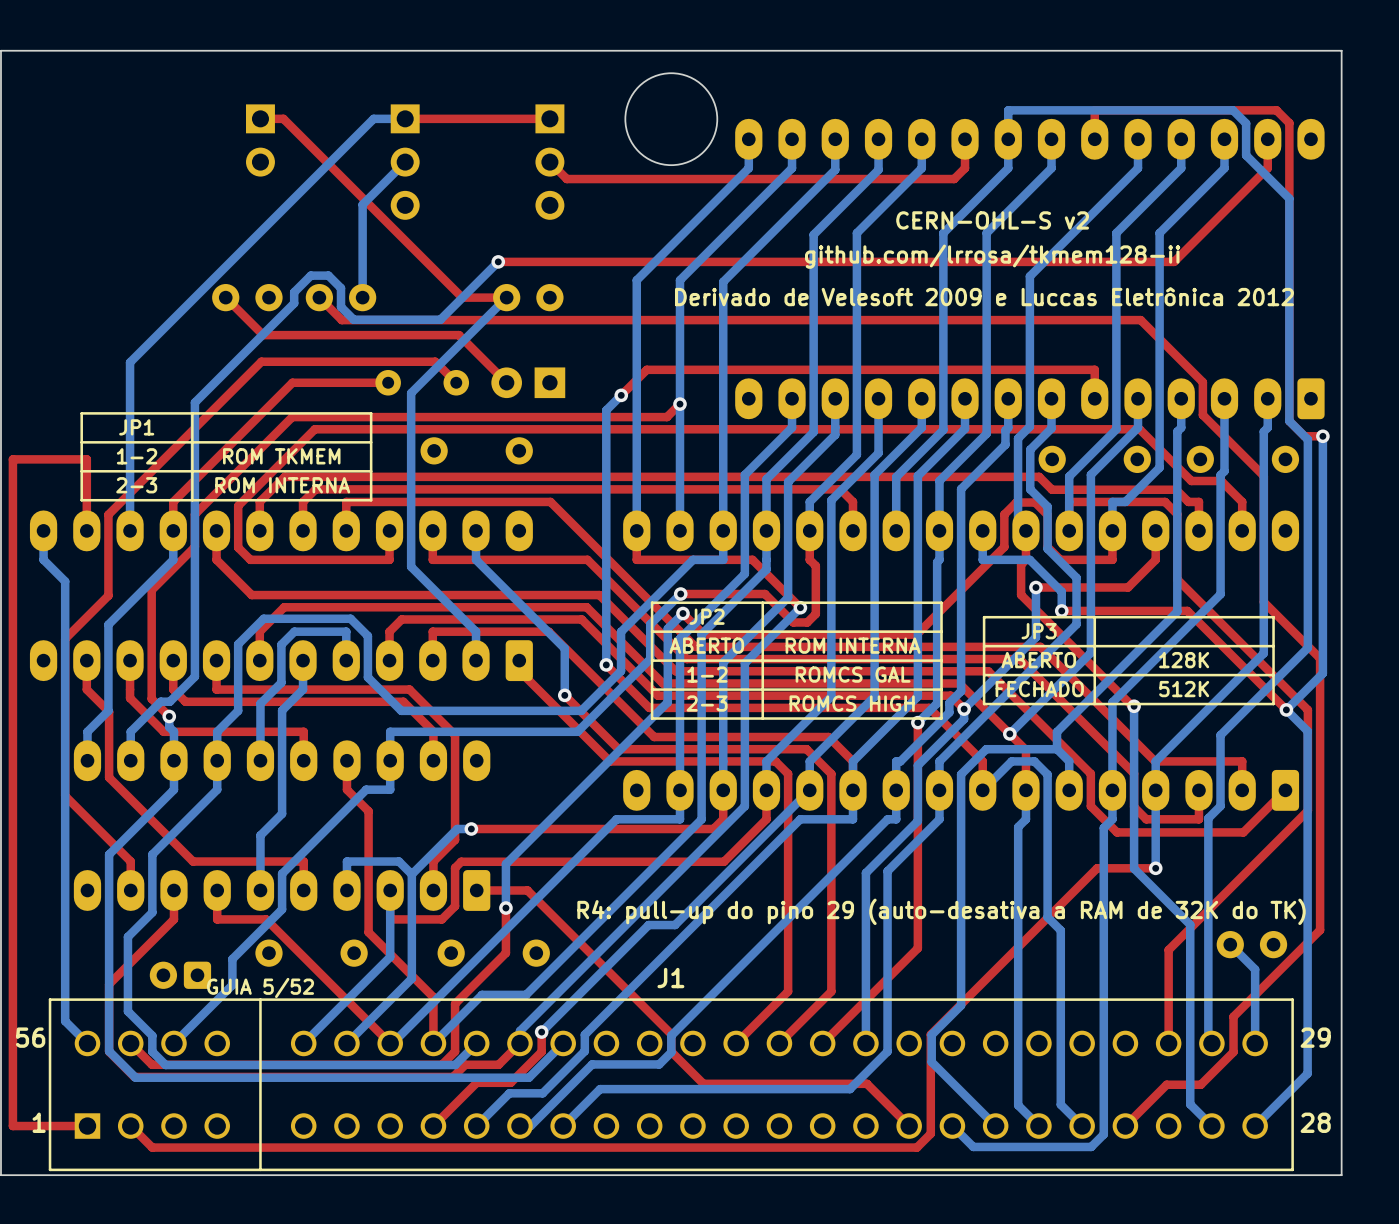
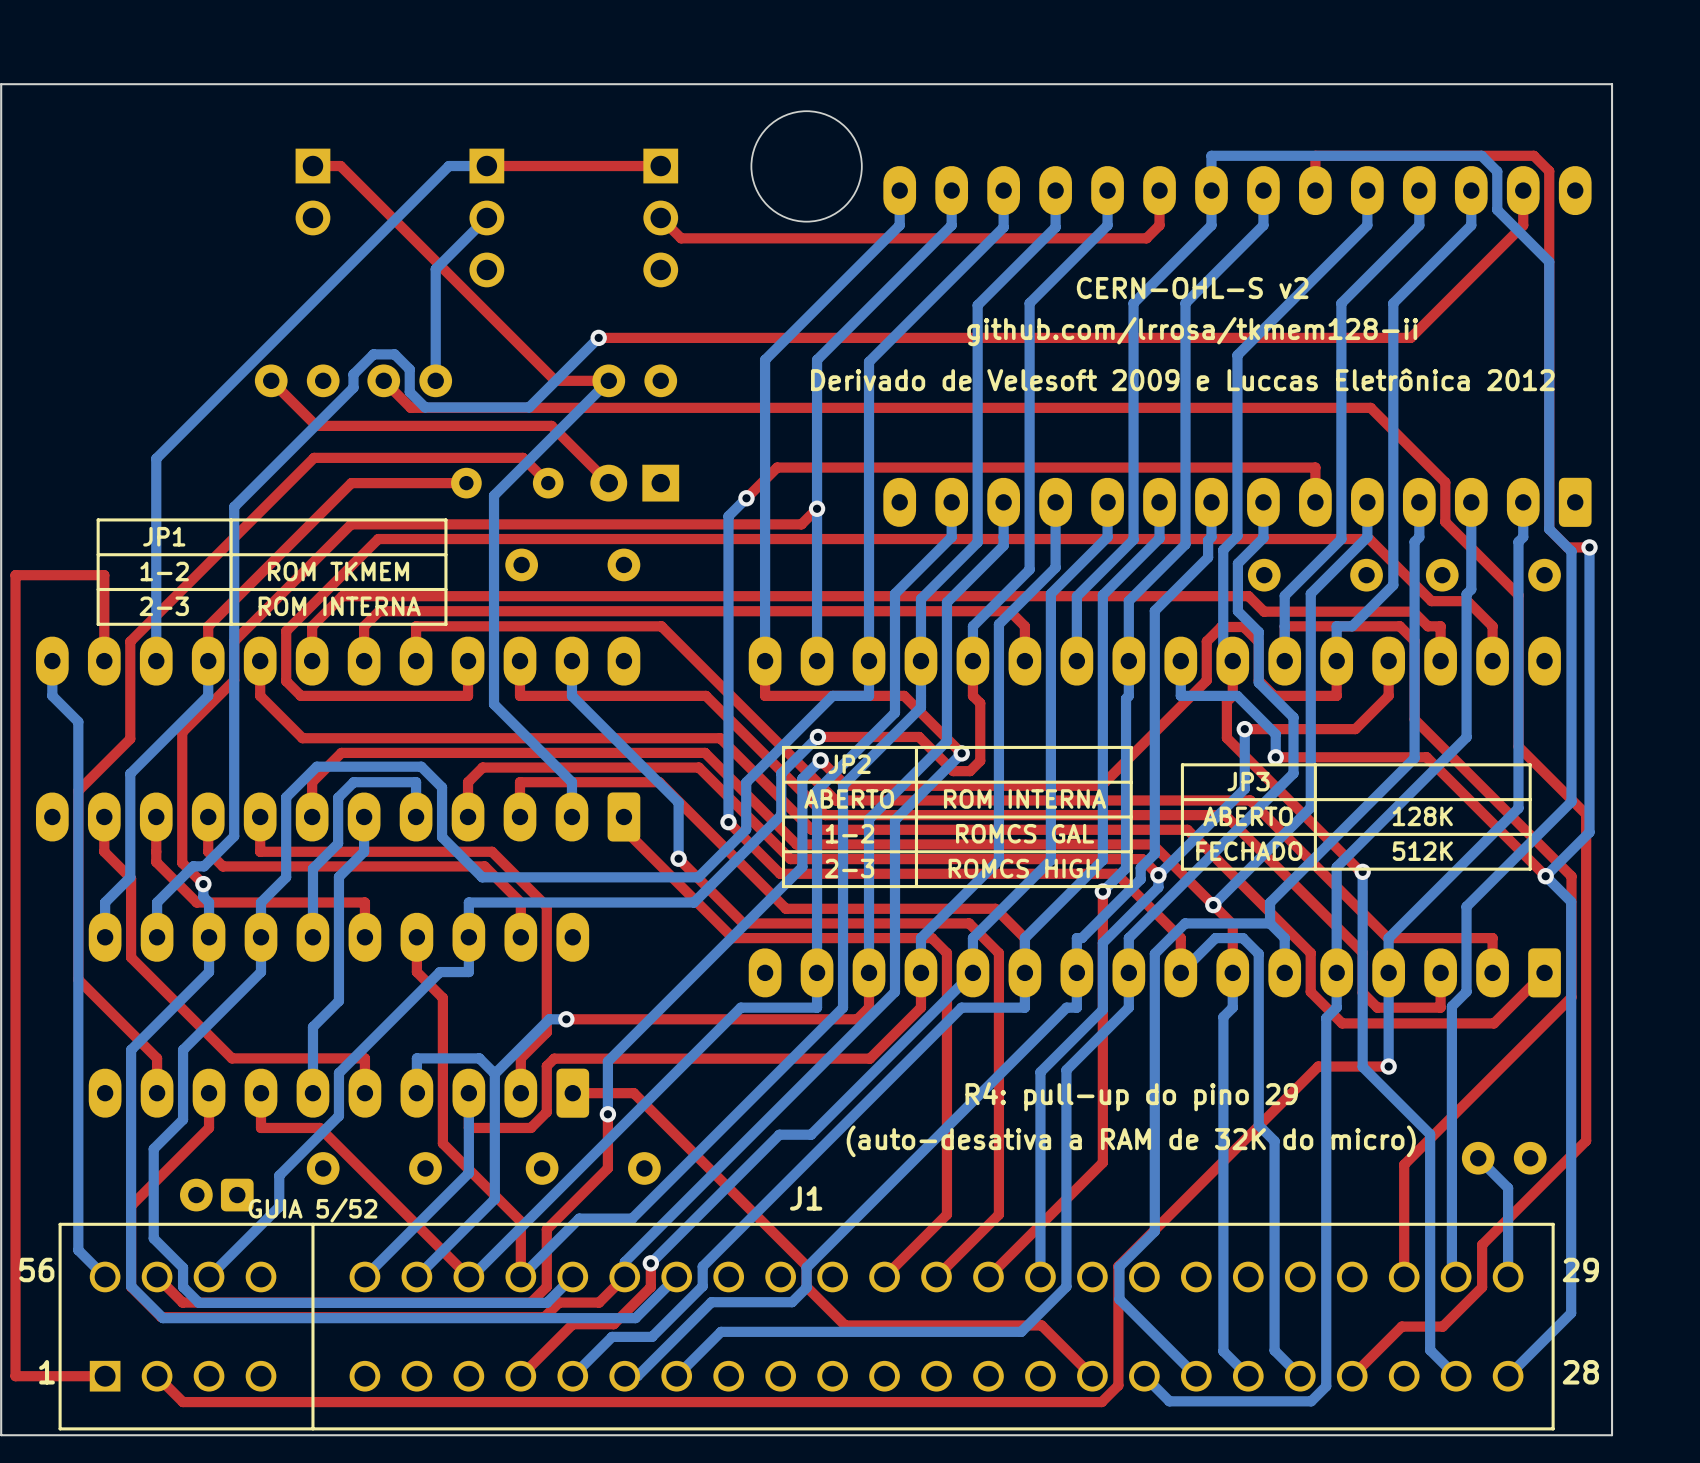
text: none -> R4: pull-up do pino 29 (1131, 1096)
text: R4: pull-up do pino 29 (auto-desativa a RAM de 32K do TK) (941, 911) -> (auto-desativa a RAM de 32K do micro) (1131, 1141)

